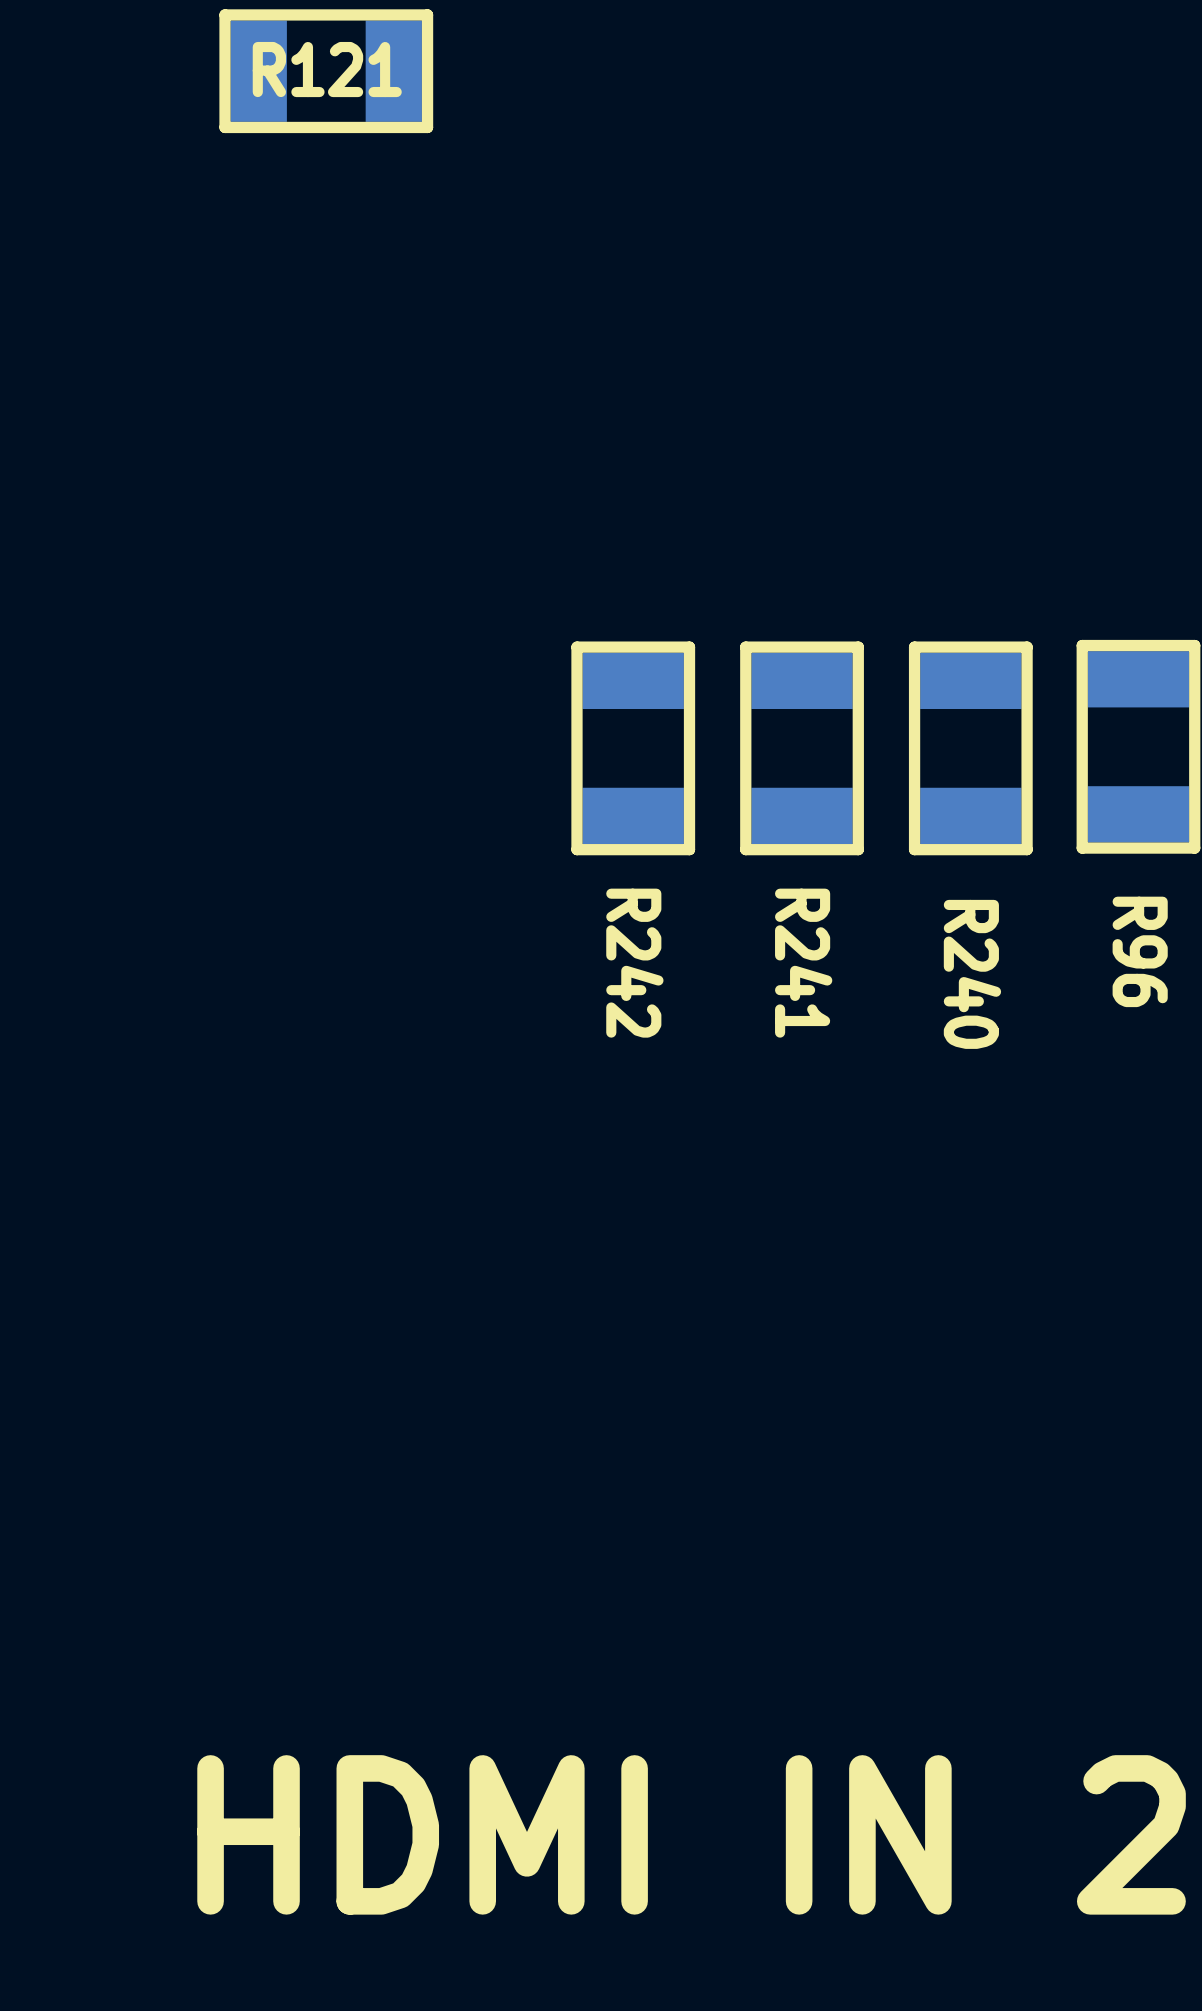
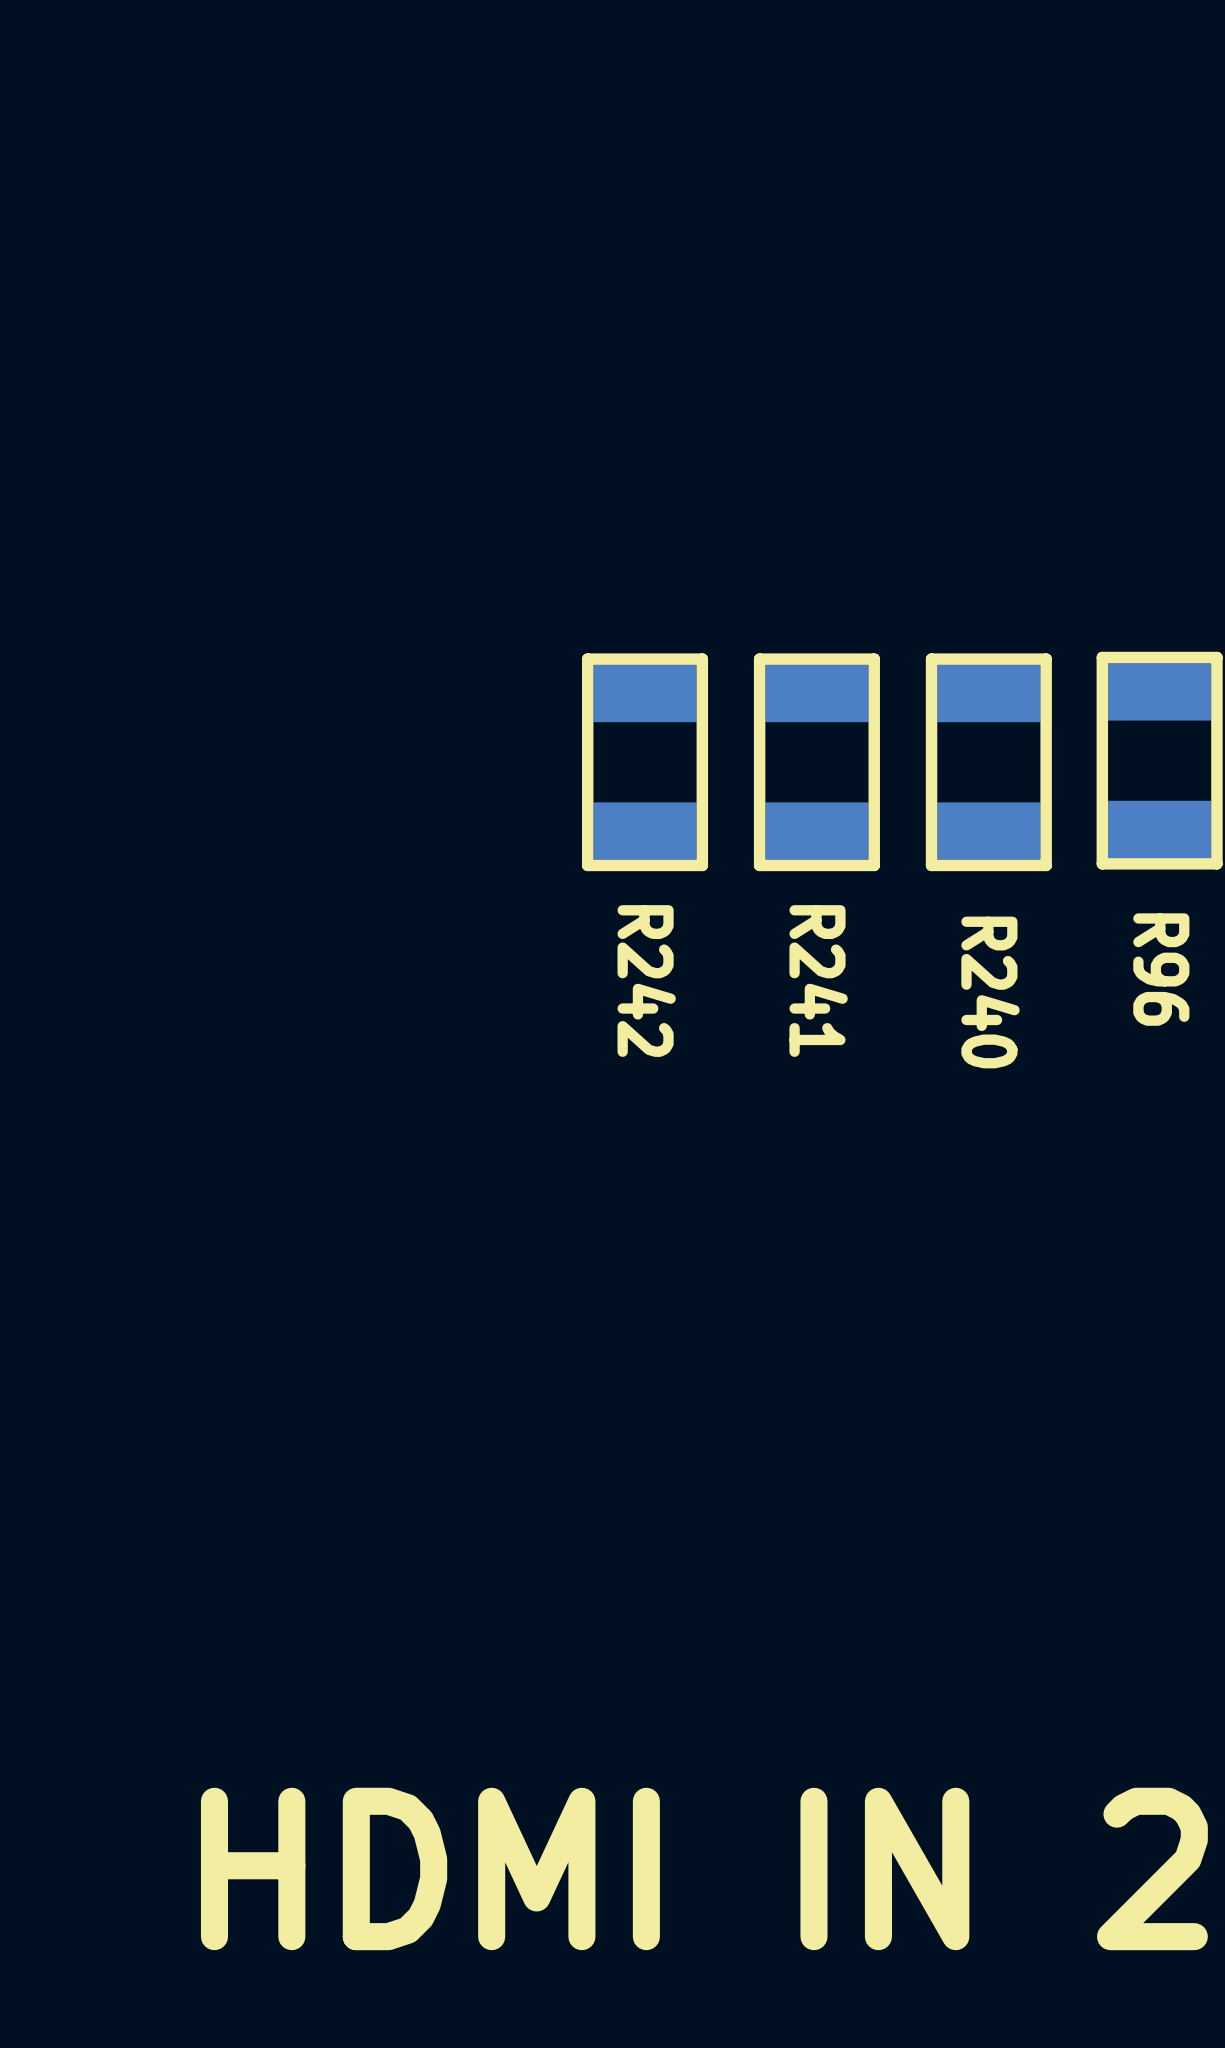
R121: (326, 71) -> none

